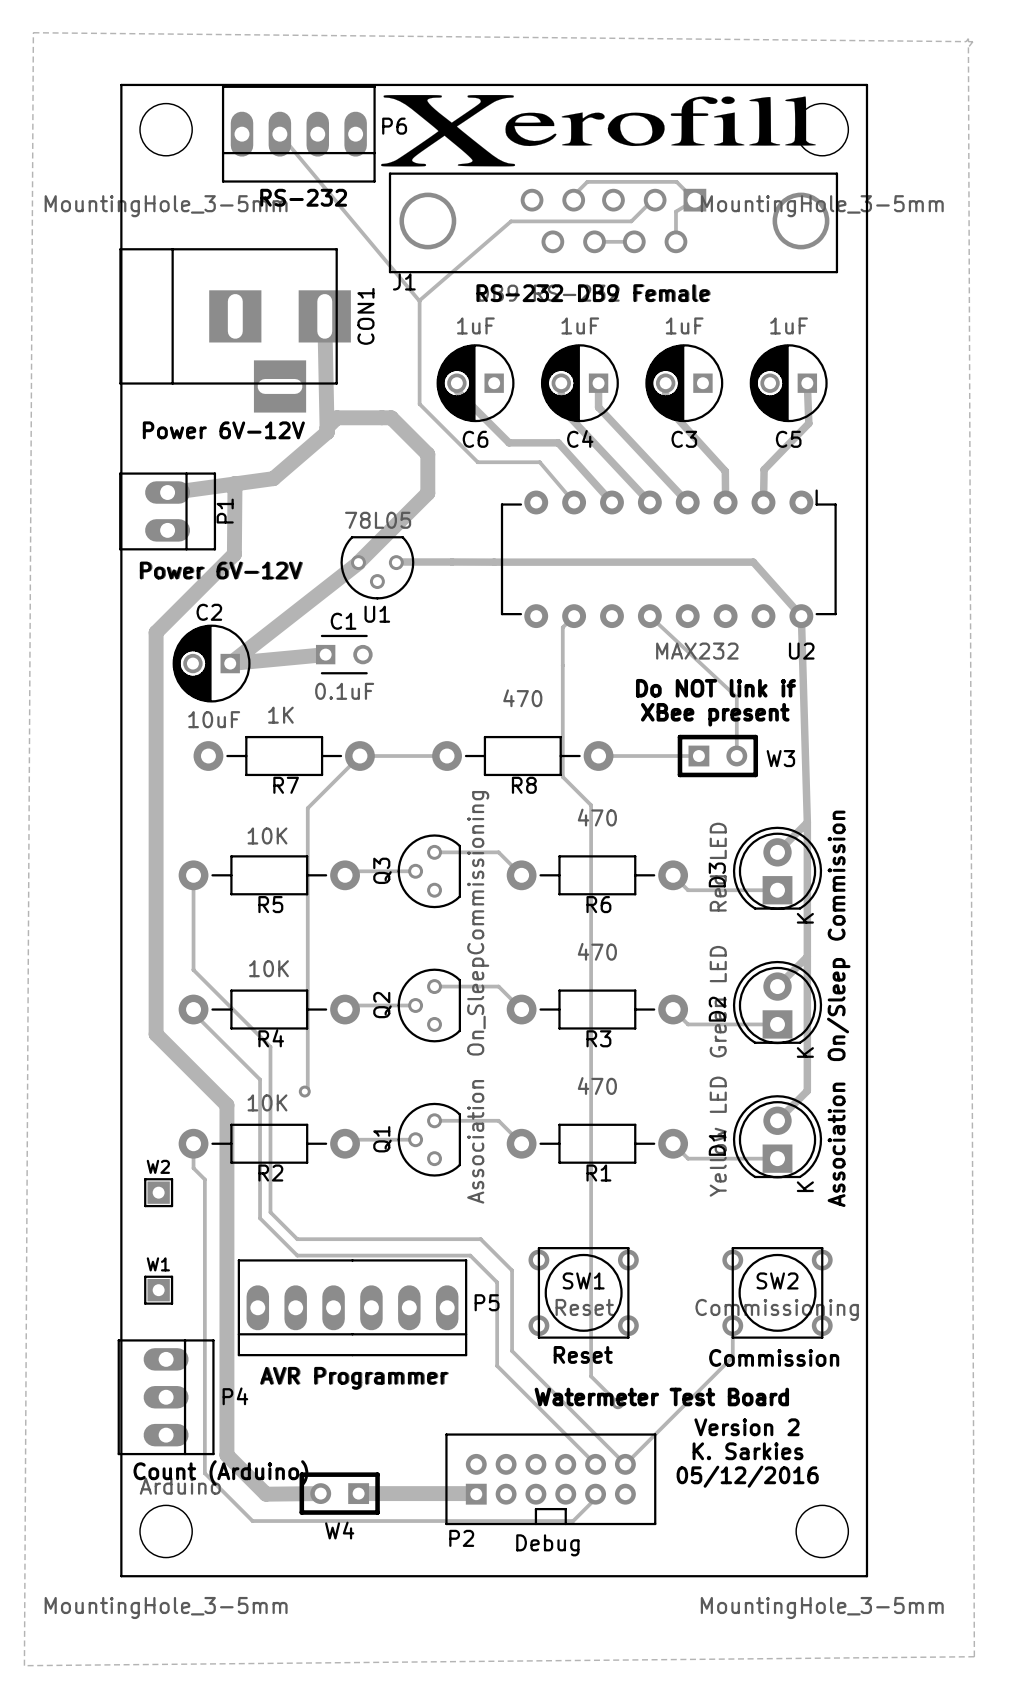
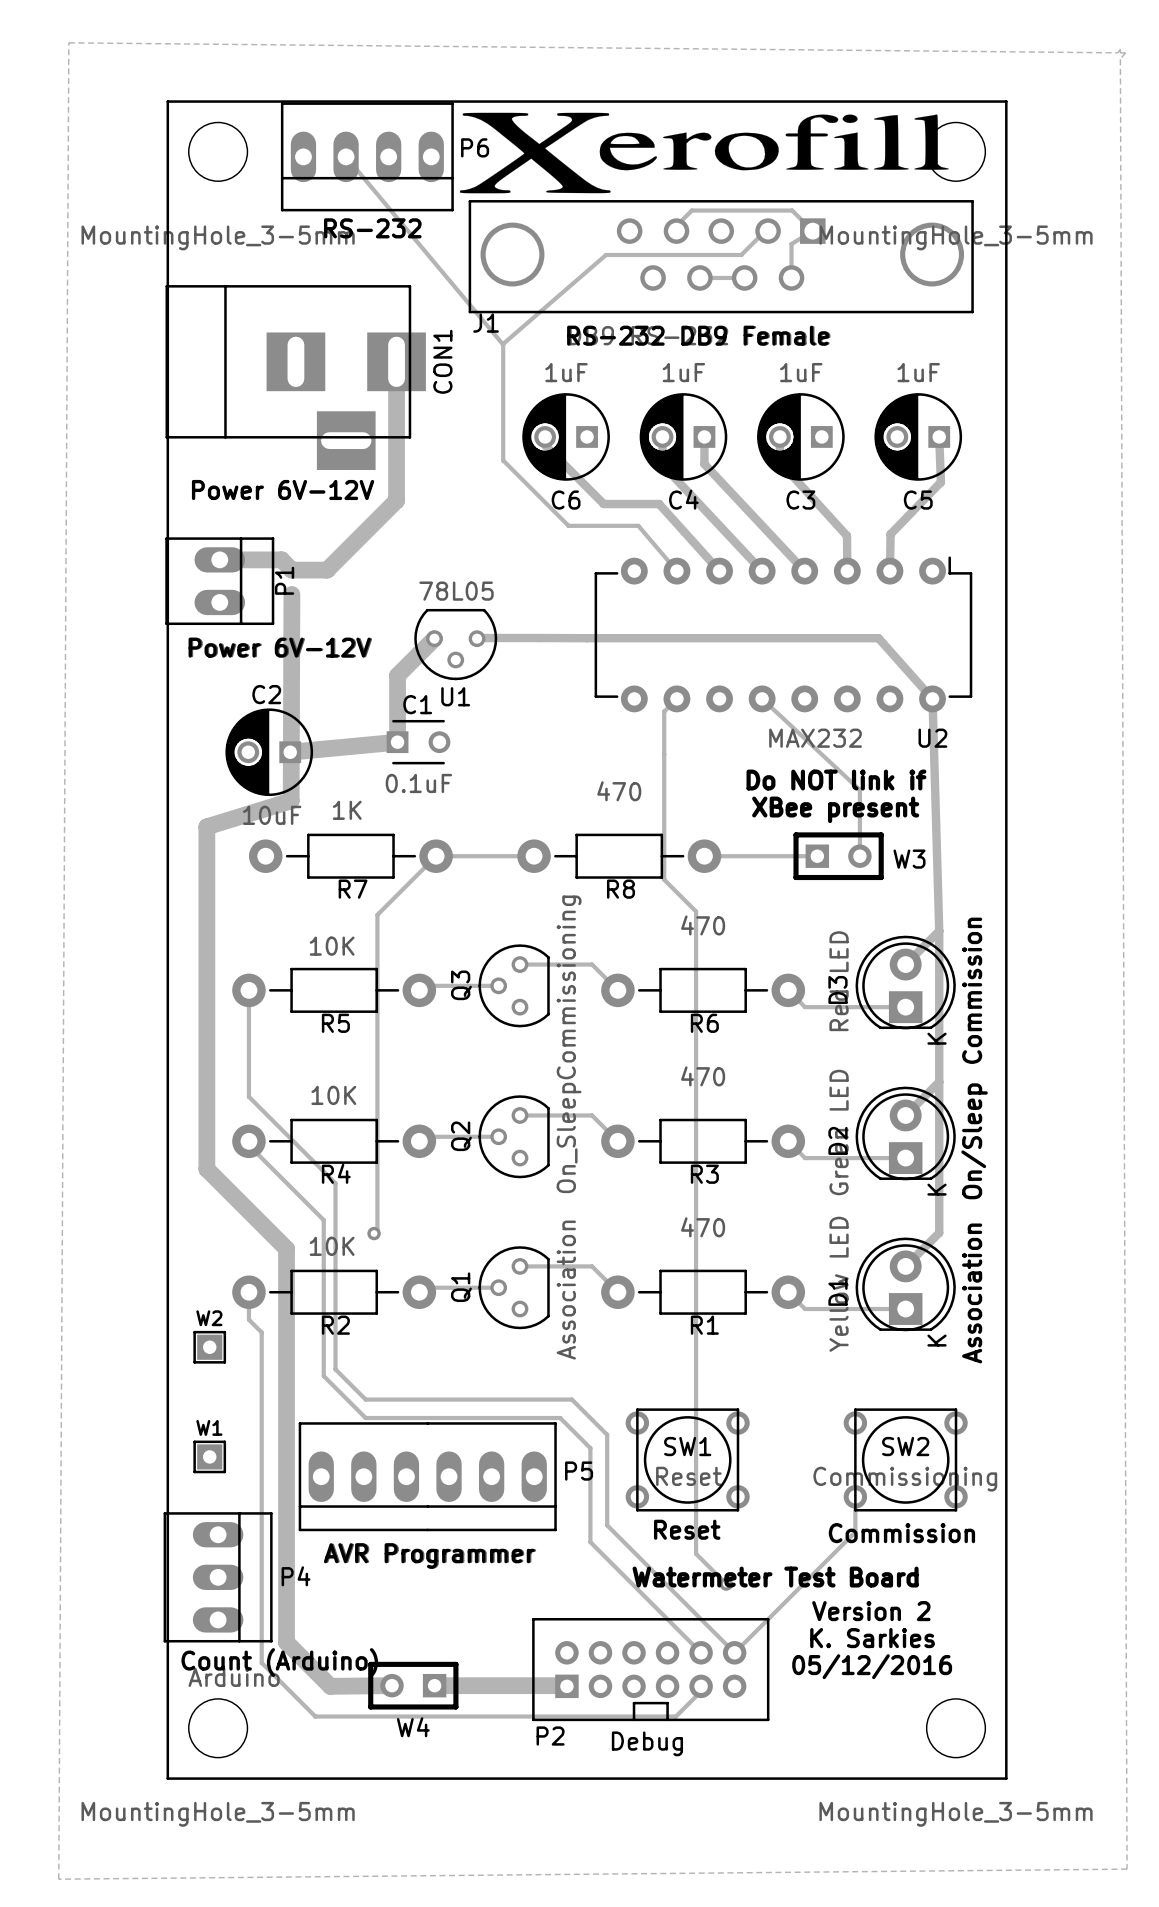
track: (324, 316) (327, 432) -> (396, 361) (396, 500) (327, 570) (291, 570) (281, 559) (219, 559)
track: (327, 432) (327, 427) (336, 417) (391, 417) (427, 454) (427, 493) (358, 562) -> (397, 742) (397, 675) (434, 638)
track: (327, 432) (273, 478) (164, 493) -> none
track: (234, 483) (234, 554) (156, 632) (156, 729) -> (291, 594) (291, 800) (206, 826)
track: (358, 563) (230, 663) -> none

